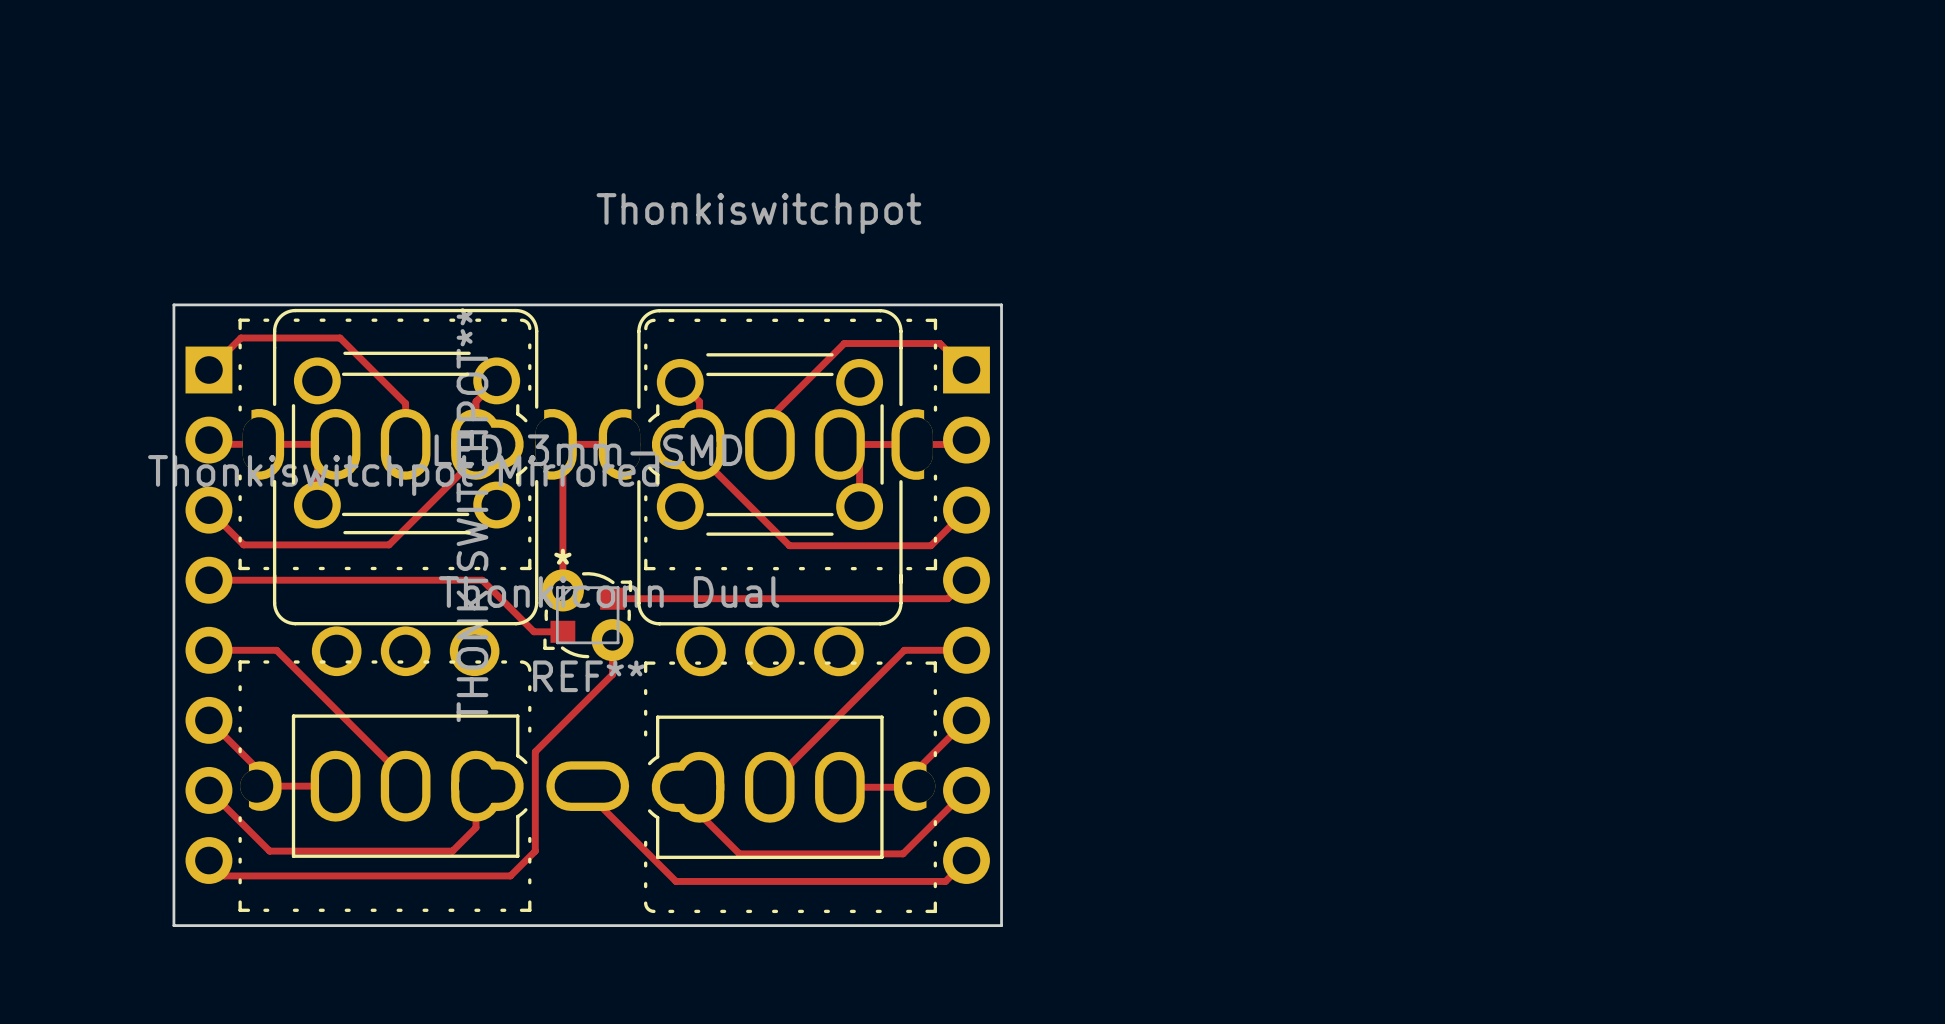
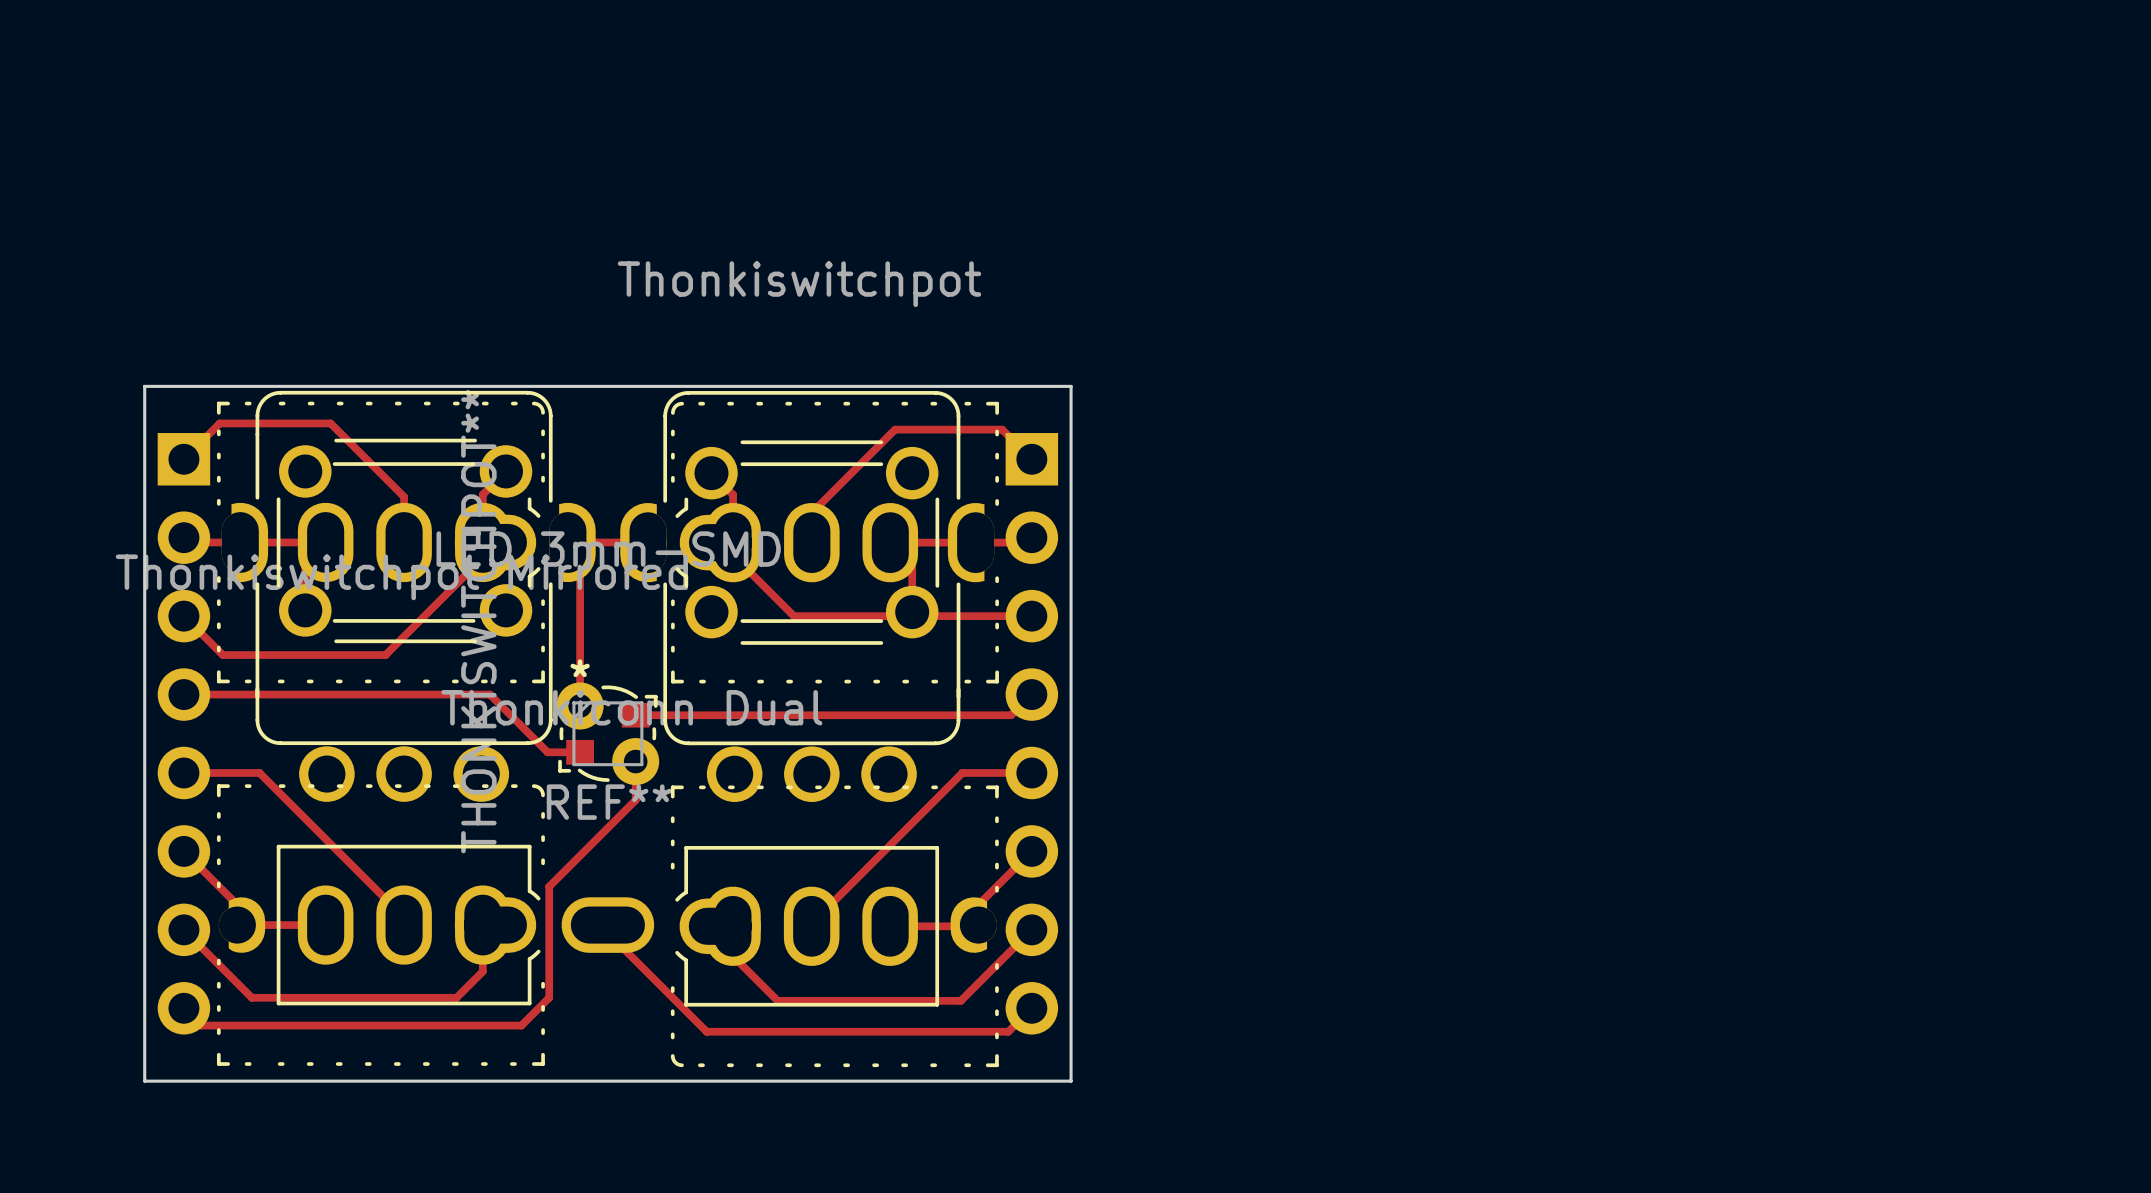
track: (753, 510) (789, 545) (930, 545) (966, 510) -> (793, 616) (1031, 616)

